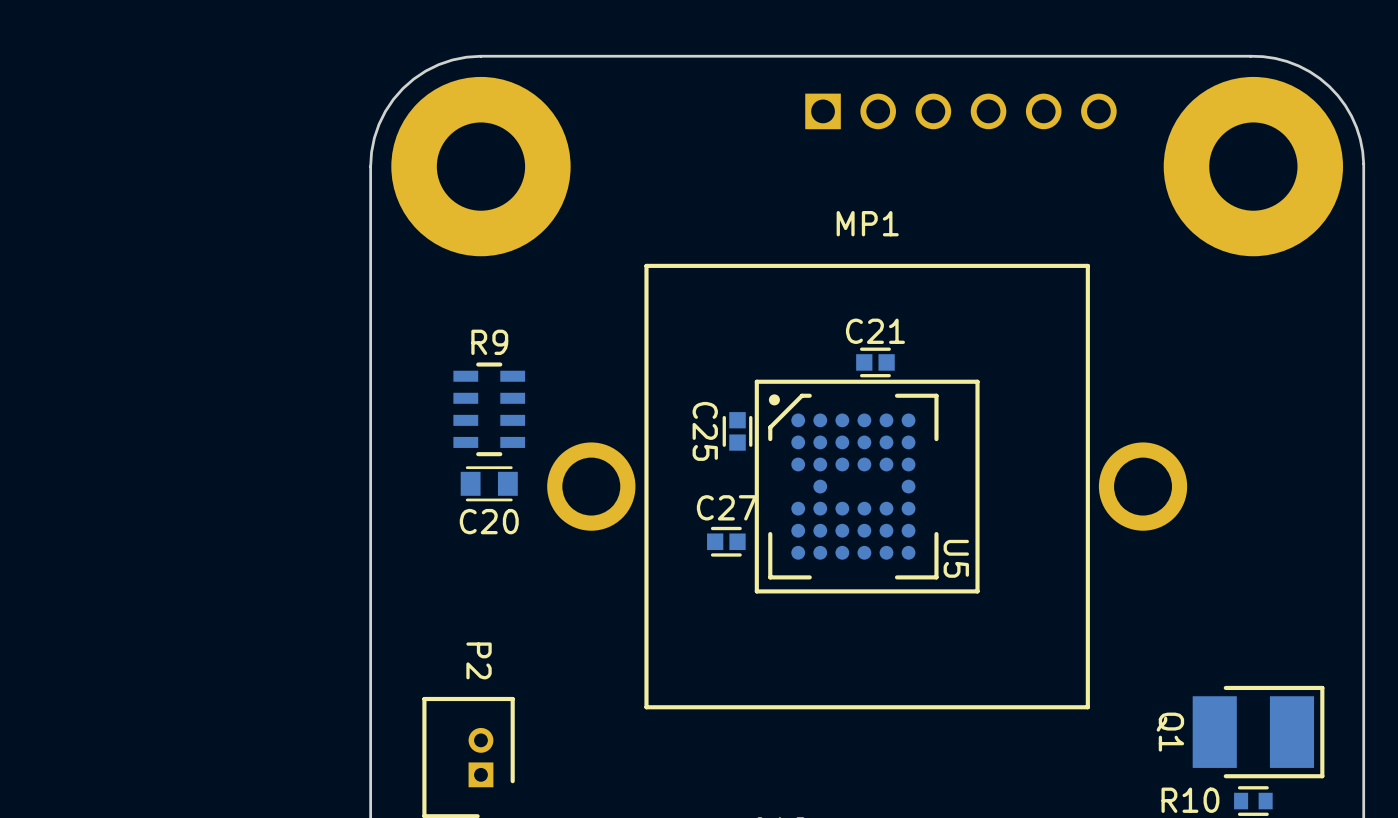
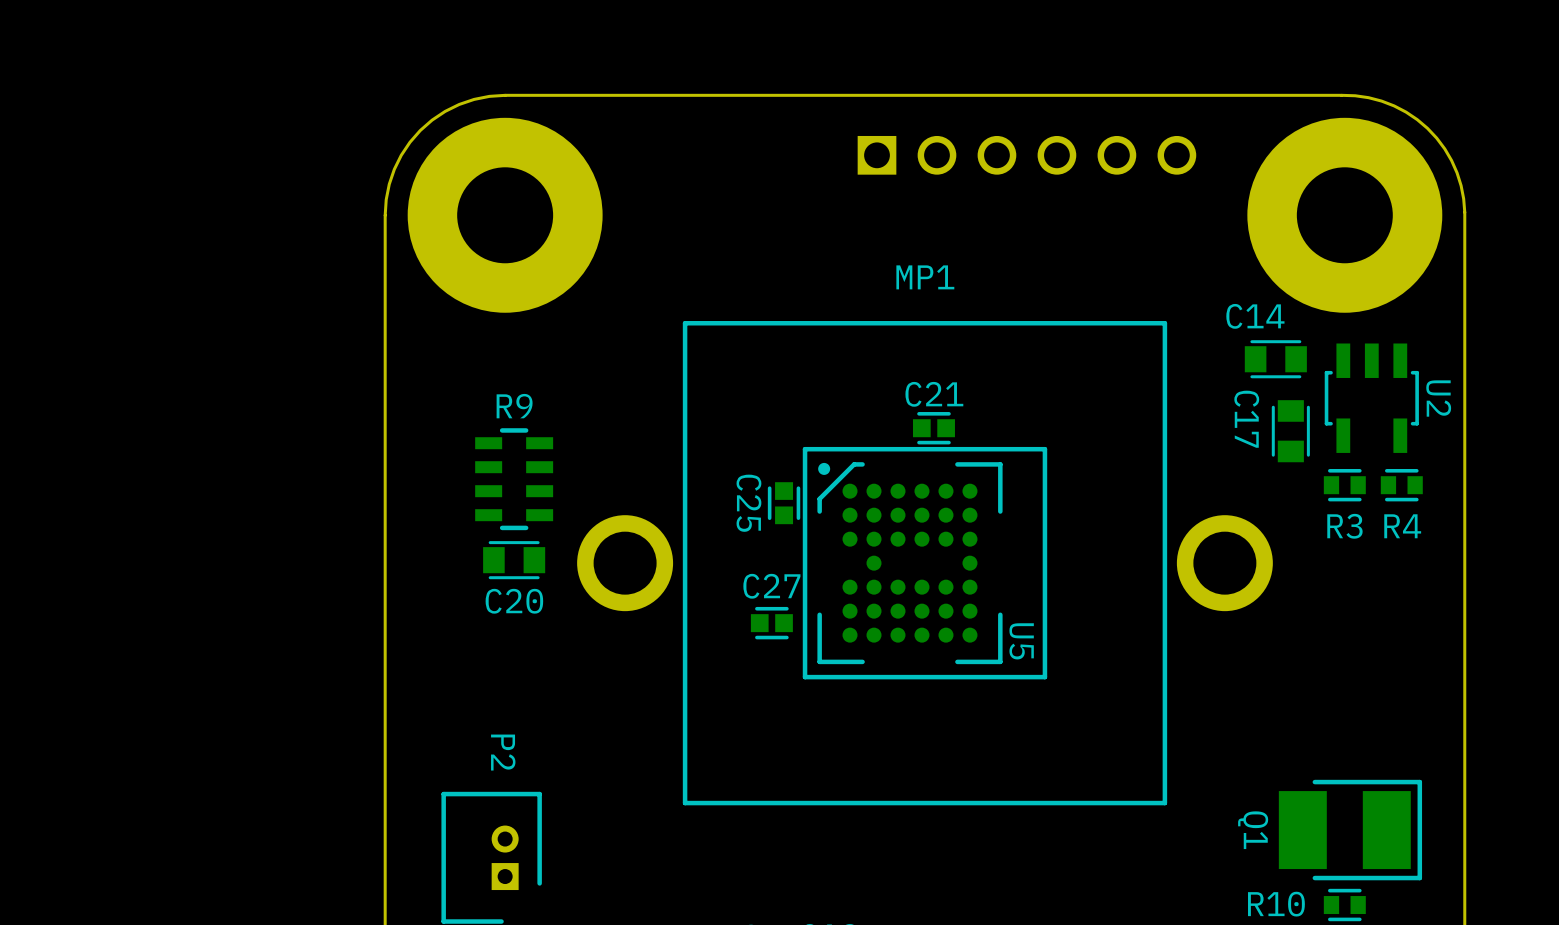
C14: none -> (1275, 359)
U2: none -> (1371, 398)
C17: none -> (1290, 431)
R3: none -> (1344, 485)
R4: none -> (1401, 485)

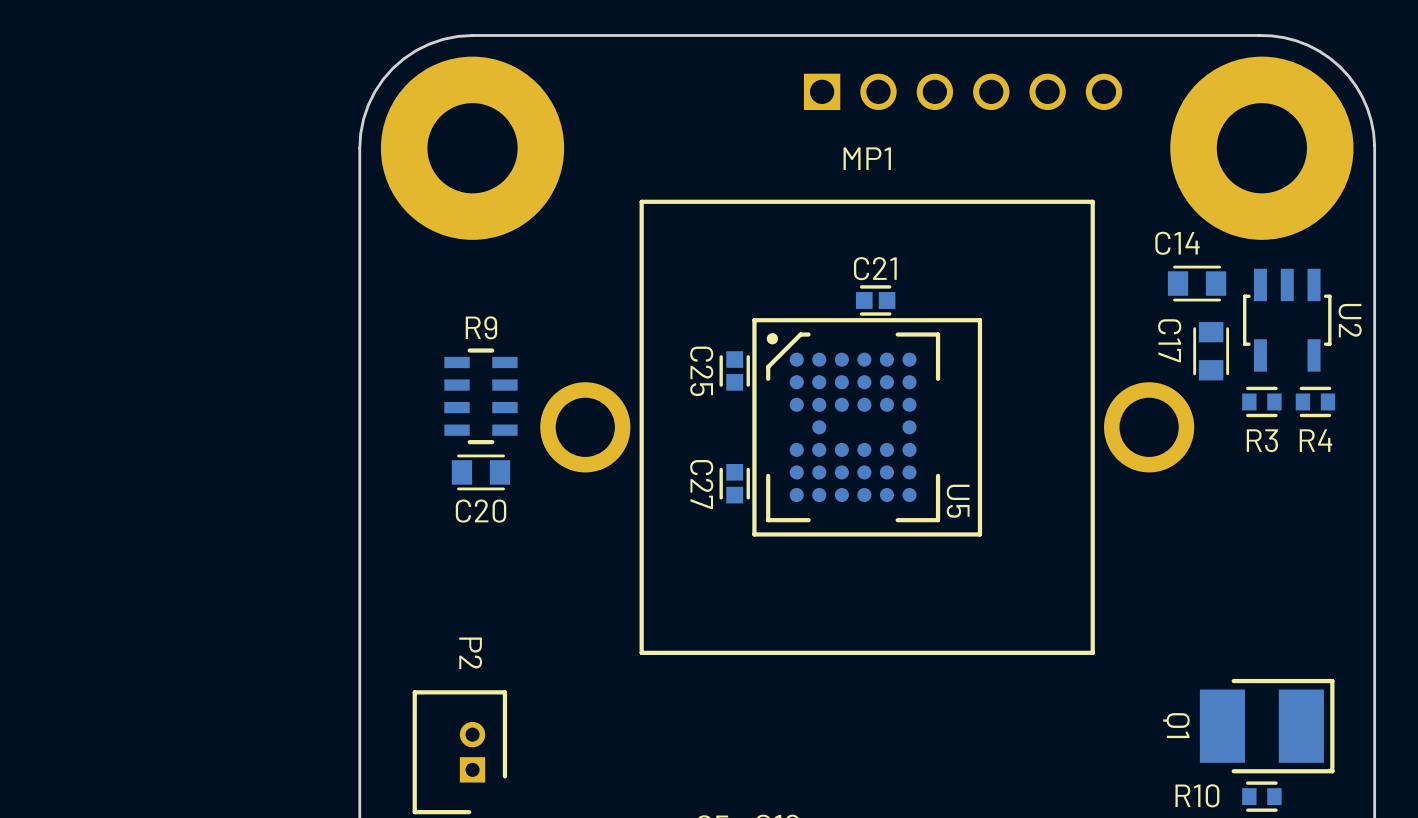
C21 position: (933, 428) -> (875, 300)
C25 position: (784, 503) -> (734, 370)
U5 position: (909, 563) -> (853, 427)
MP1 position: (924, 563) -> (867, 427)
C27 rotation: 0° (771, 623) -> 90° clockwise (734, 483)
C27 position: (771, 623) -> (734, 483)

